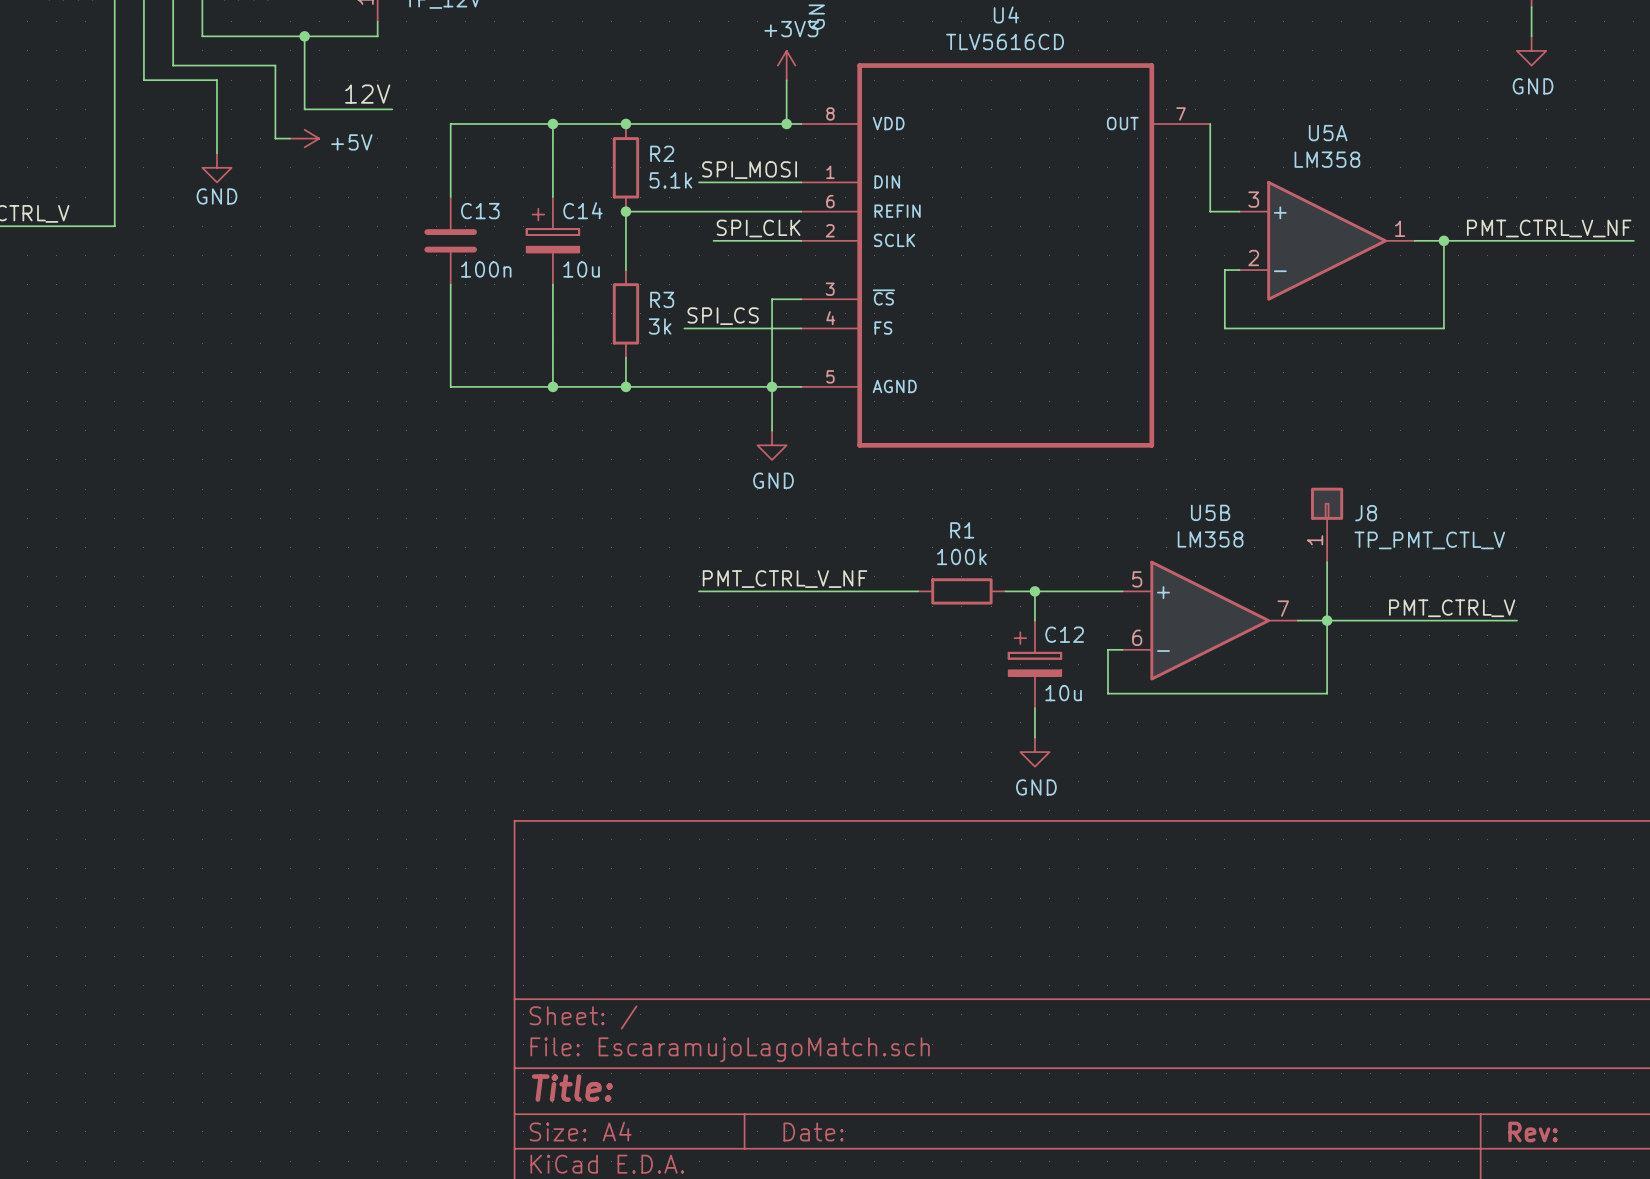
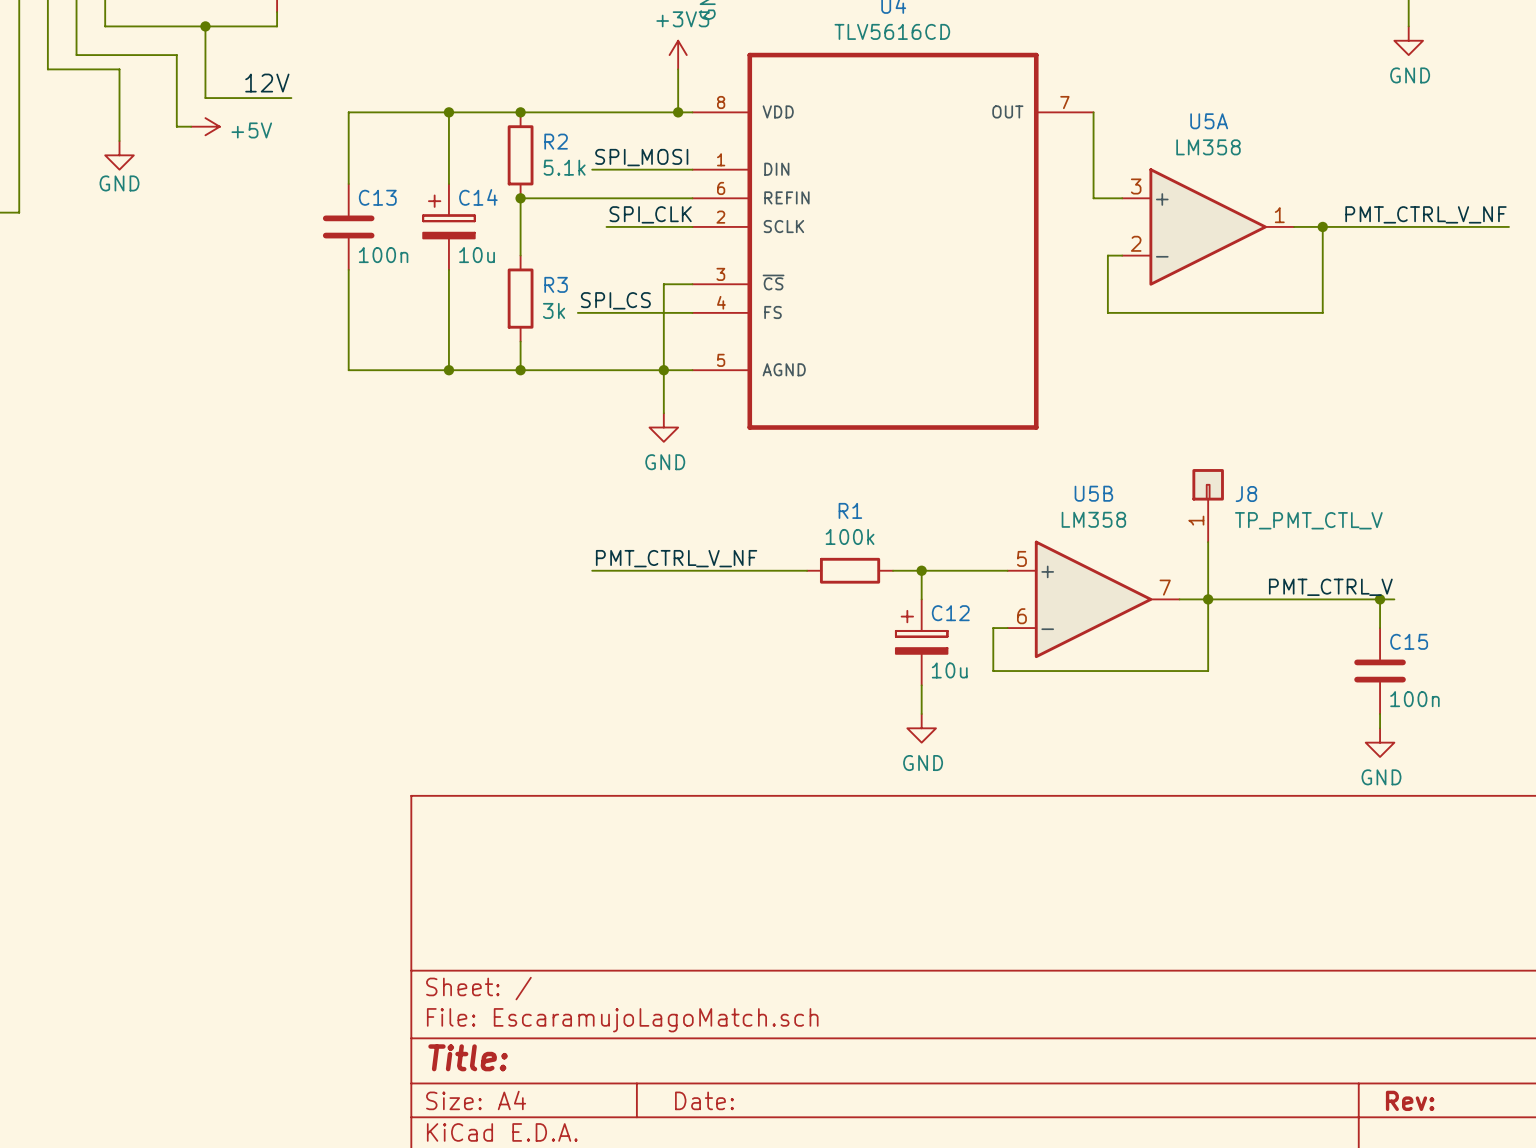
wire: none -> (1380, 599) (1380, 628)
junction: none -> (1380, 599)
C15: none -> 100n (1380, 671)
wire: none -> (1380, 713) (1380, 728)
power symbol: none -> GND (1380, 742)

